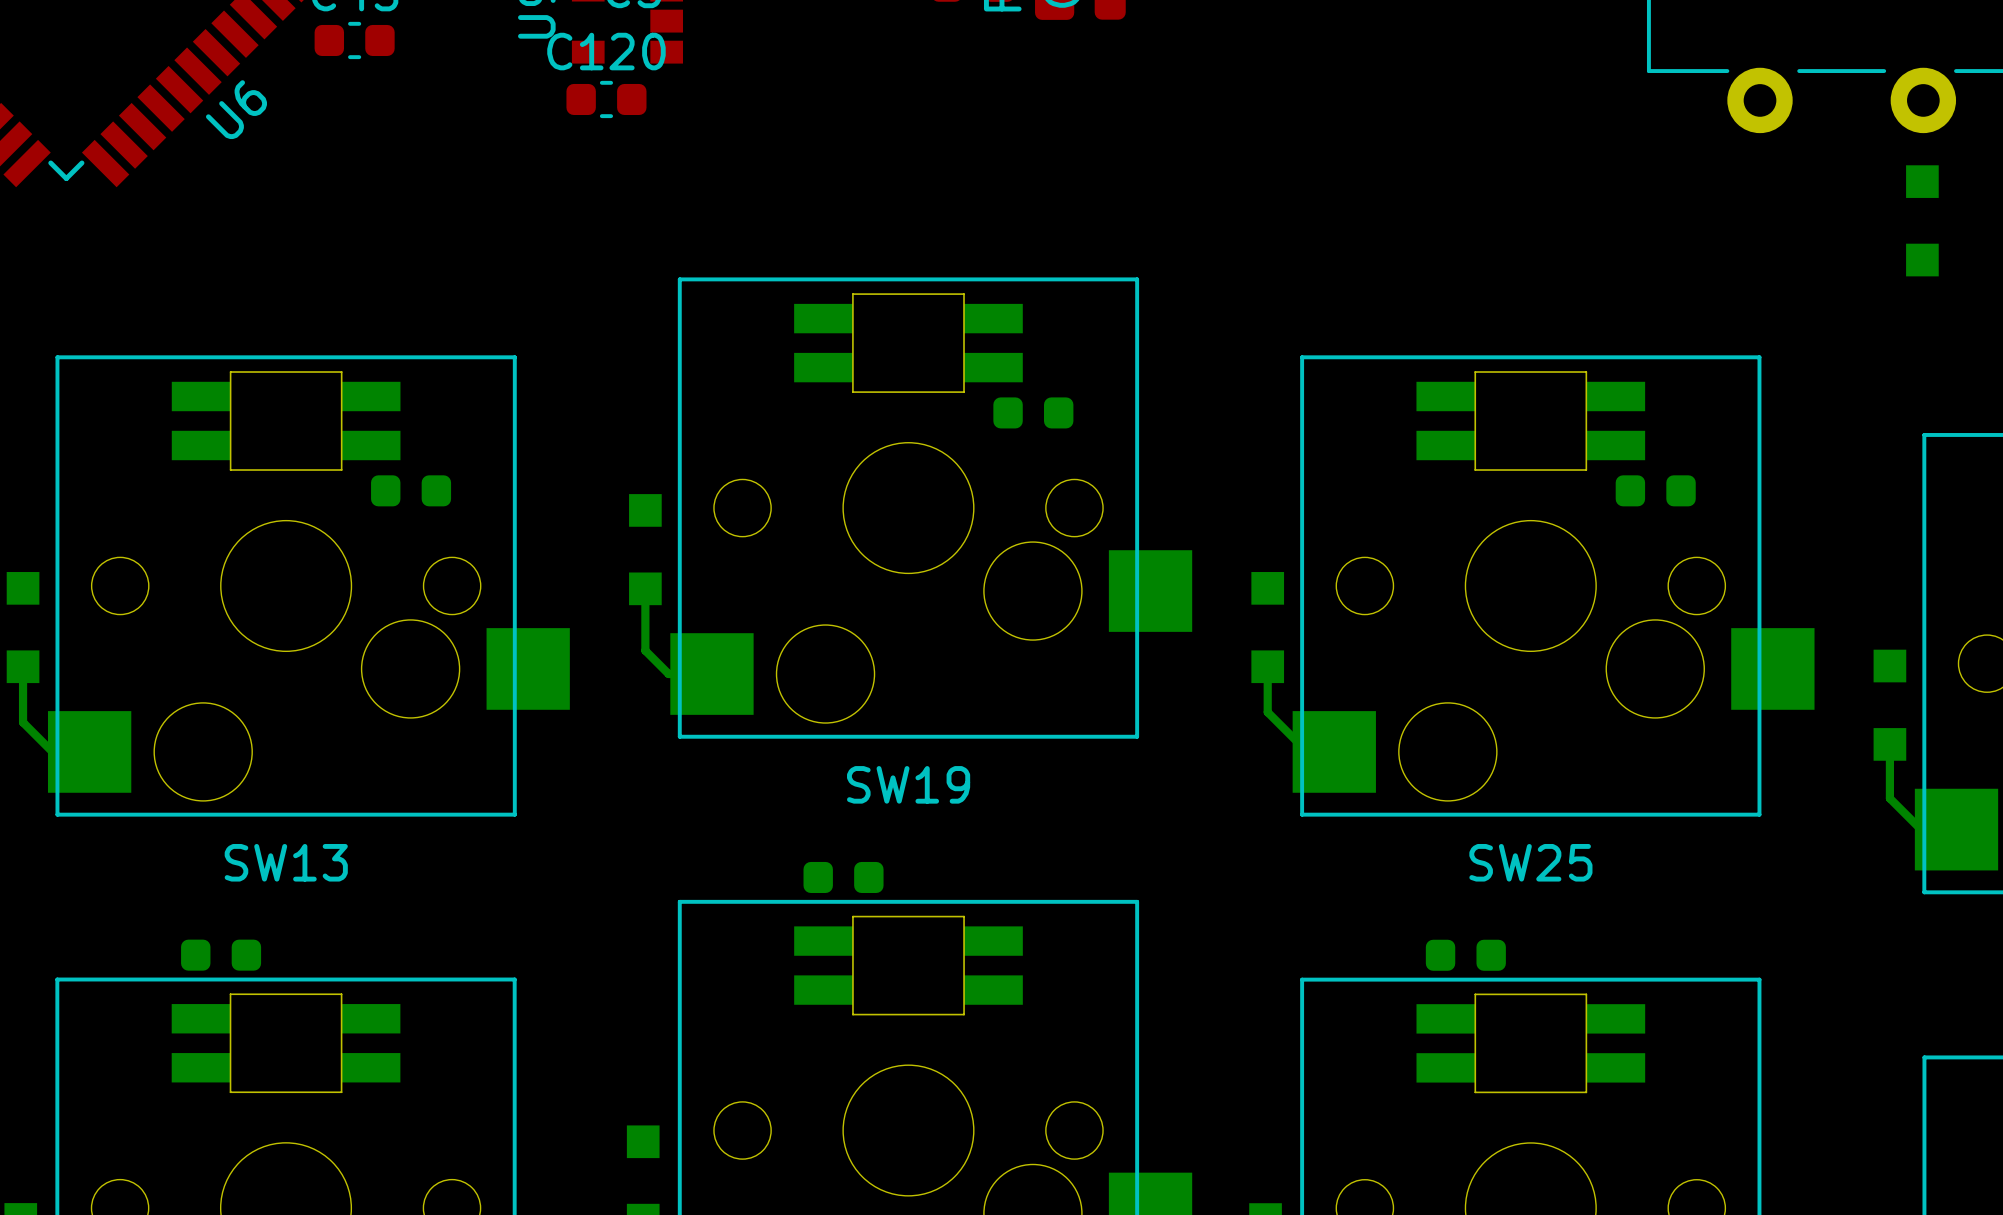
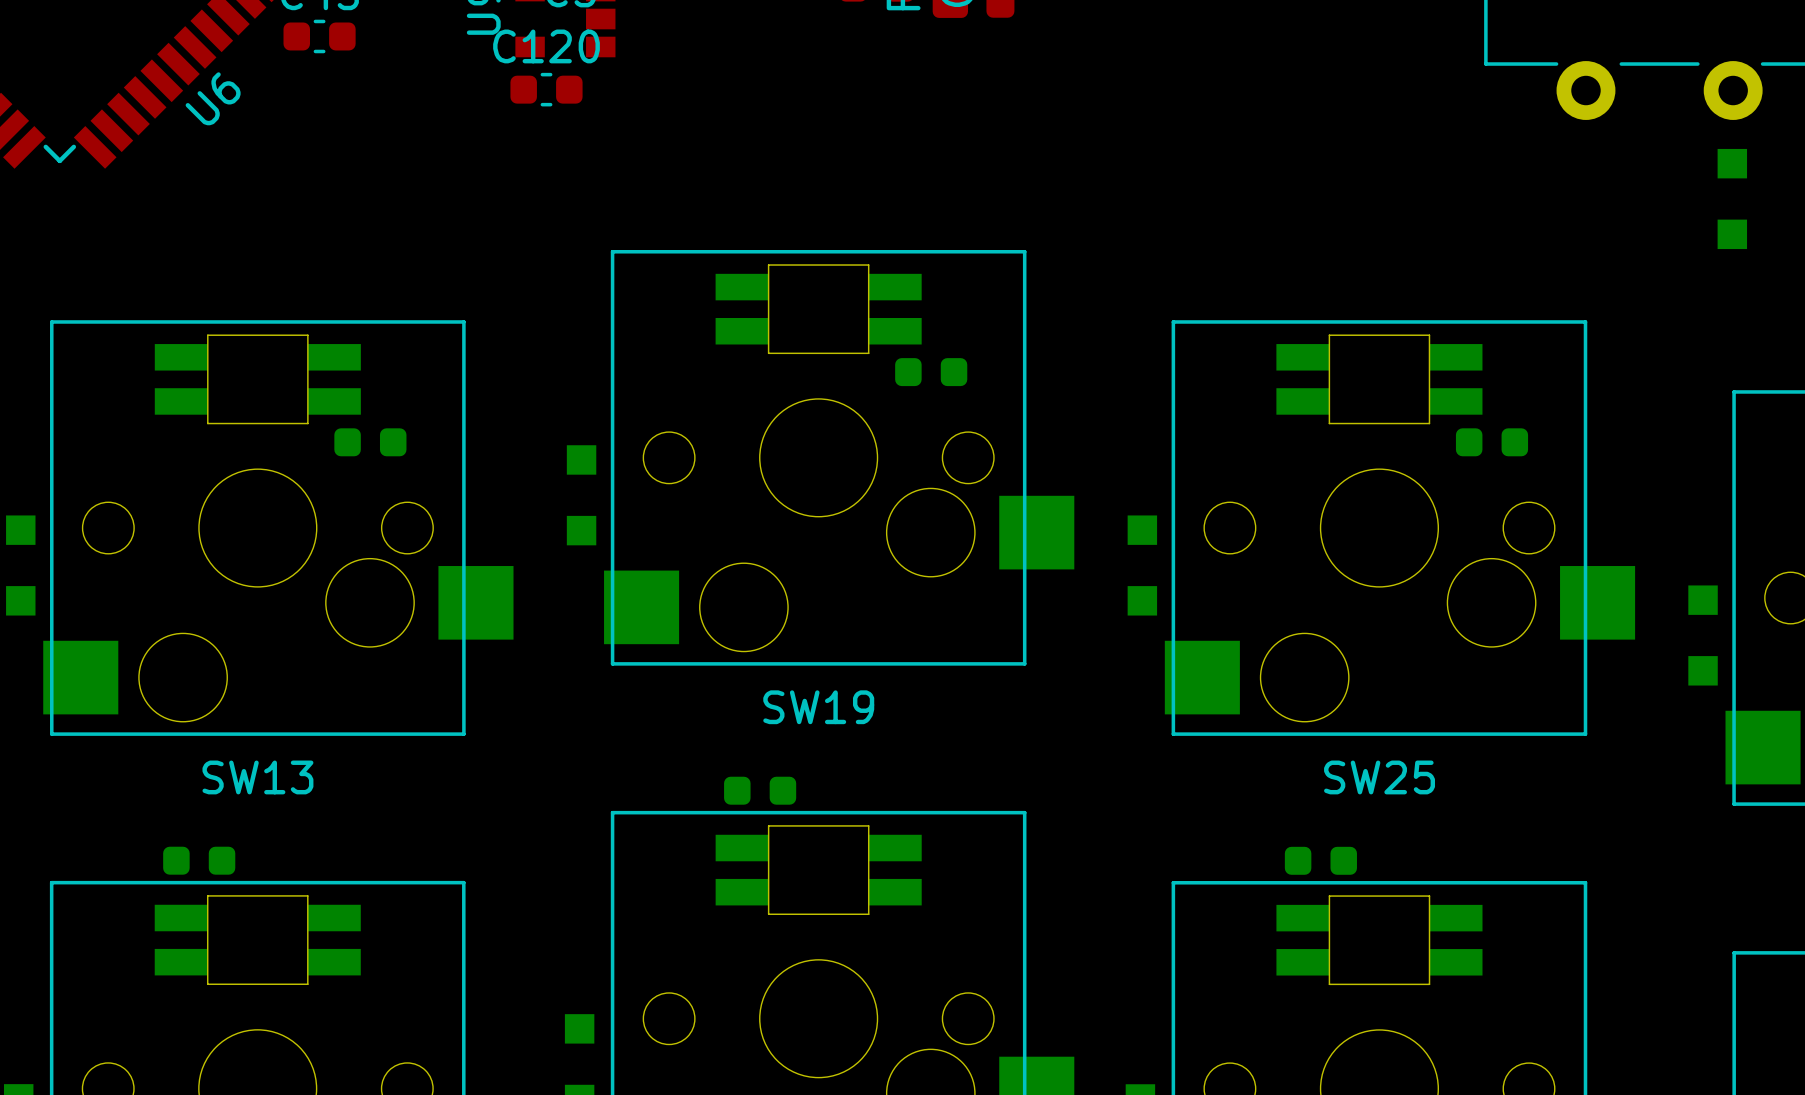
bottom track: (645, 588) (645, 650) (668, 674) (711, 674) -> none
bottom track: (23, 666) (23, 722) (52, 751) (89, 751) -> none
bottom track: (1267, 666) (1267, 712) (1307, 751) (1334, 751) -> none
bottom track: (1889, 744) (1889, 798) (1921, 829) (1956, 829) -> none

